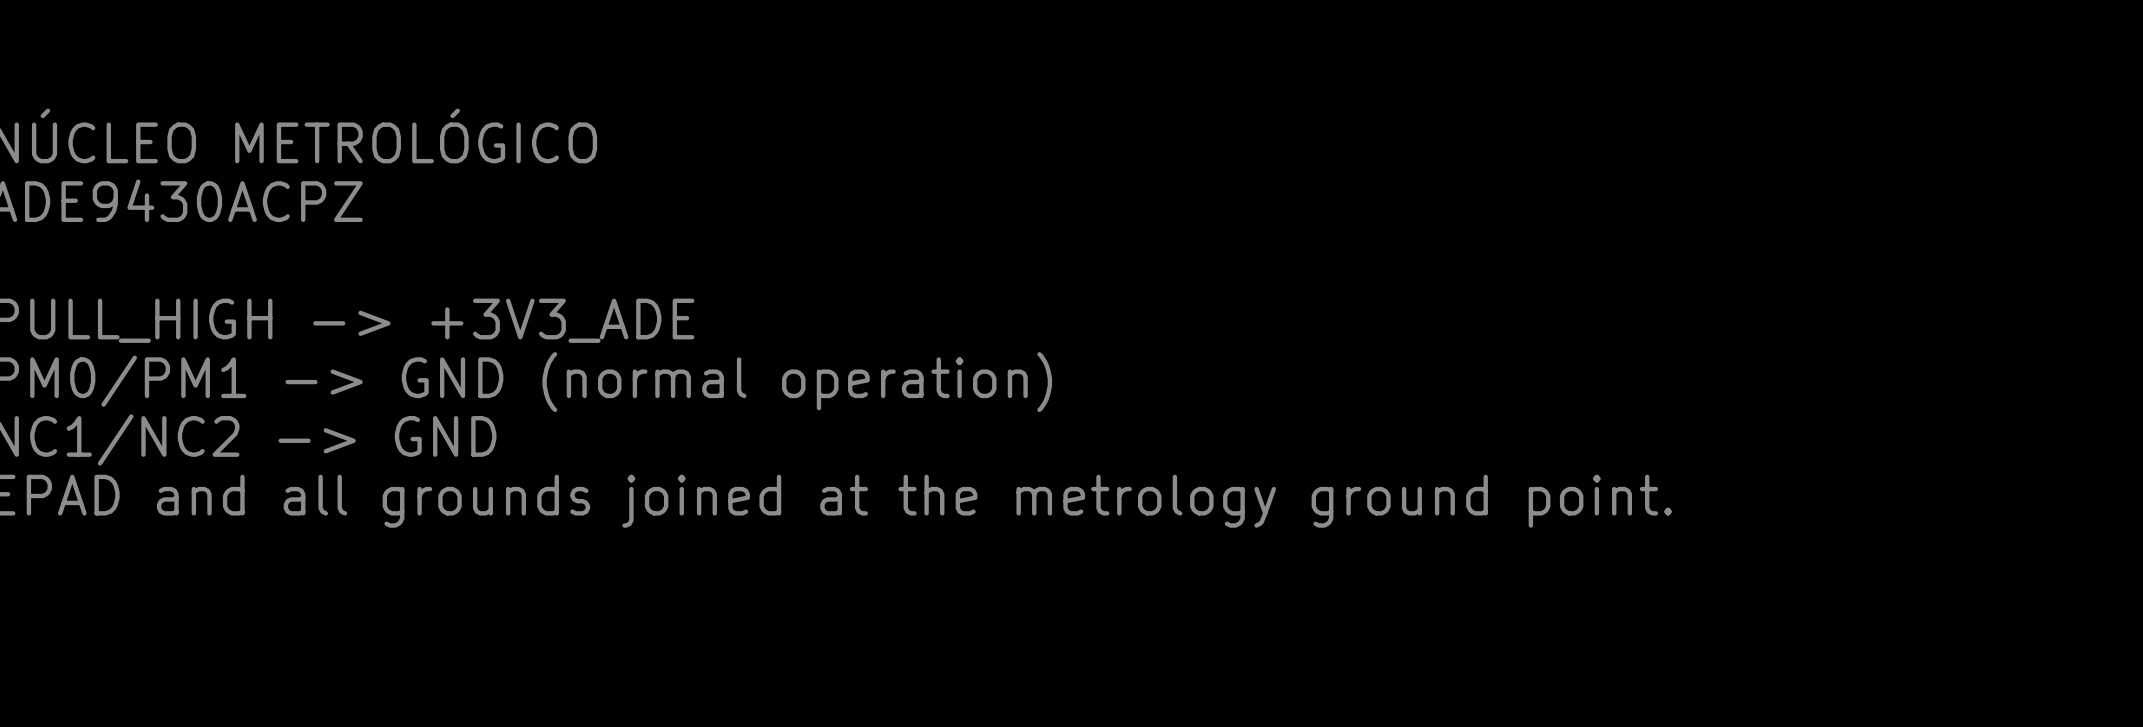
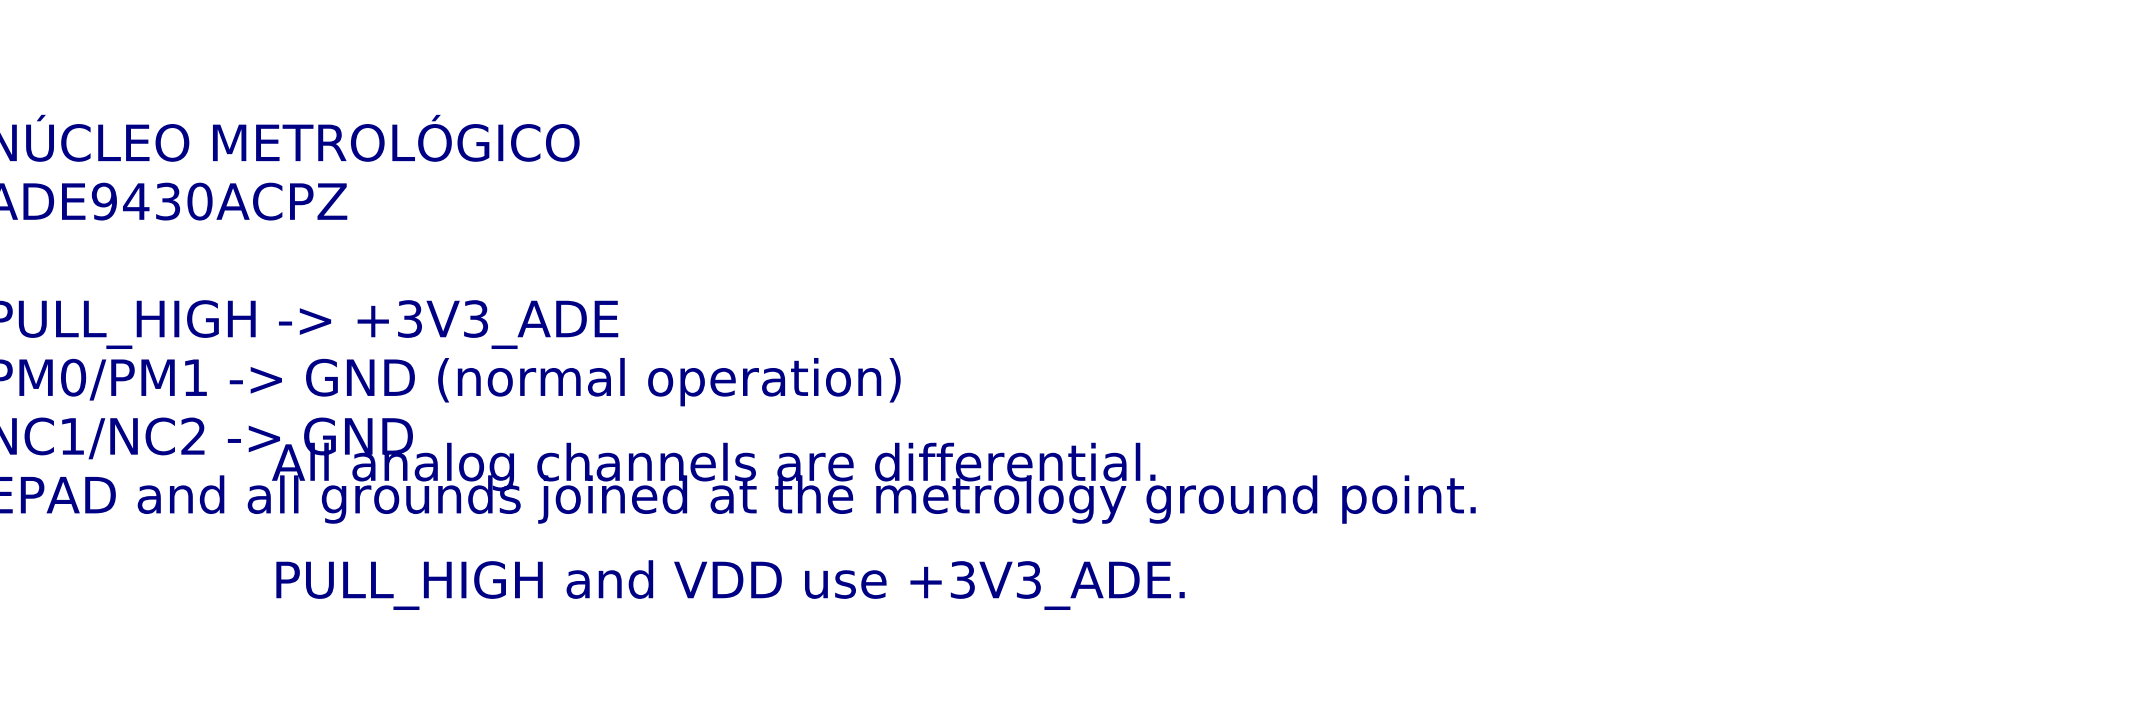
text: none -> All analog channels are differential. (713, 467)
text: none -> PULL_HIGH and VDD use +3V3_ADE. (730, 585)

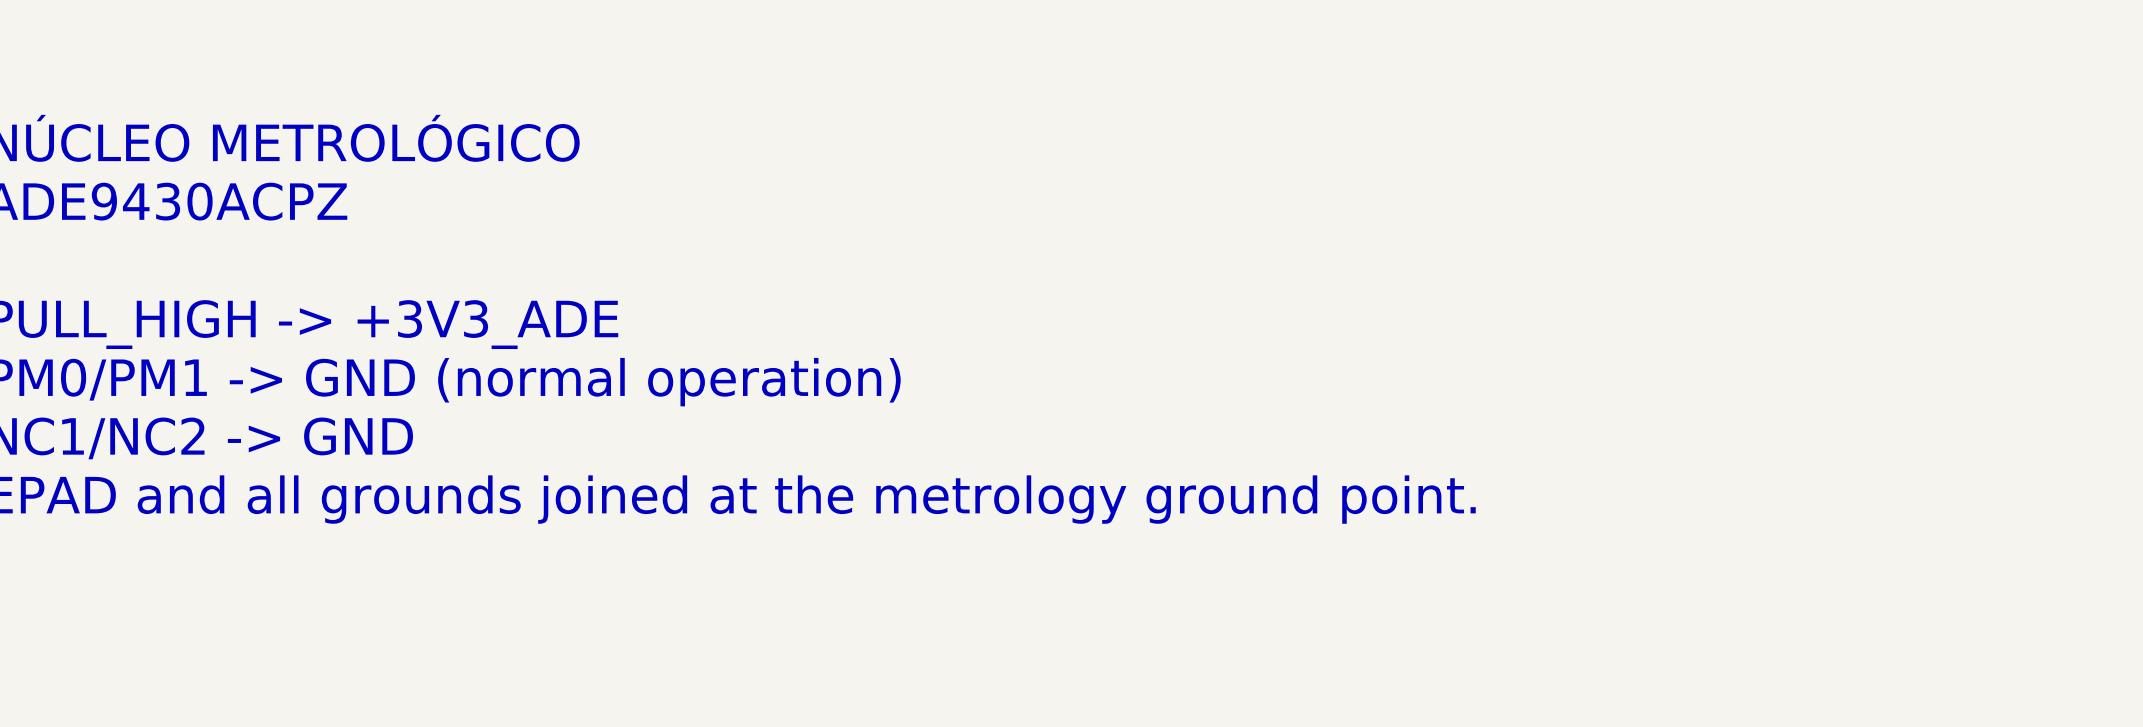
text: All analog channels are differential. (713, 467) -> none
text: PULL_HIGH and VDD use +3V3_ADE. (730, 585) -> none

